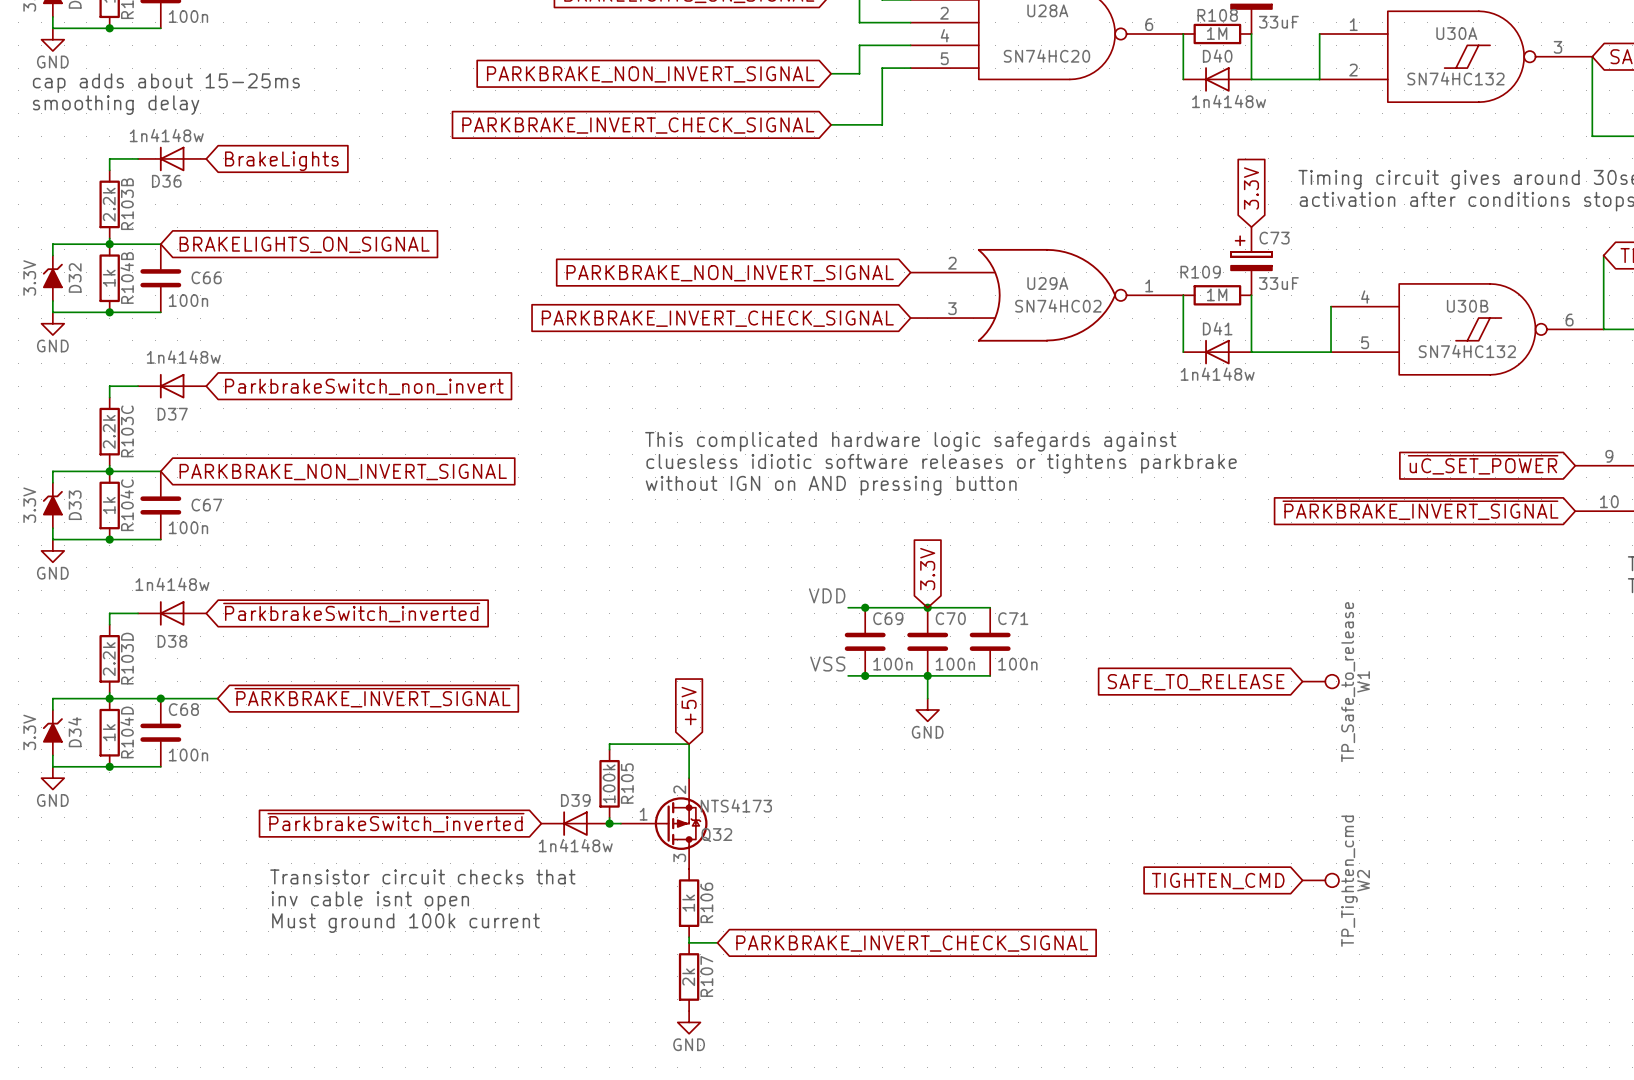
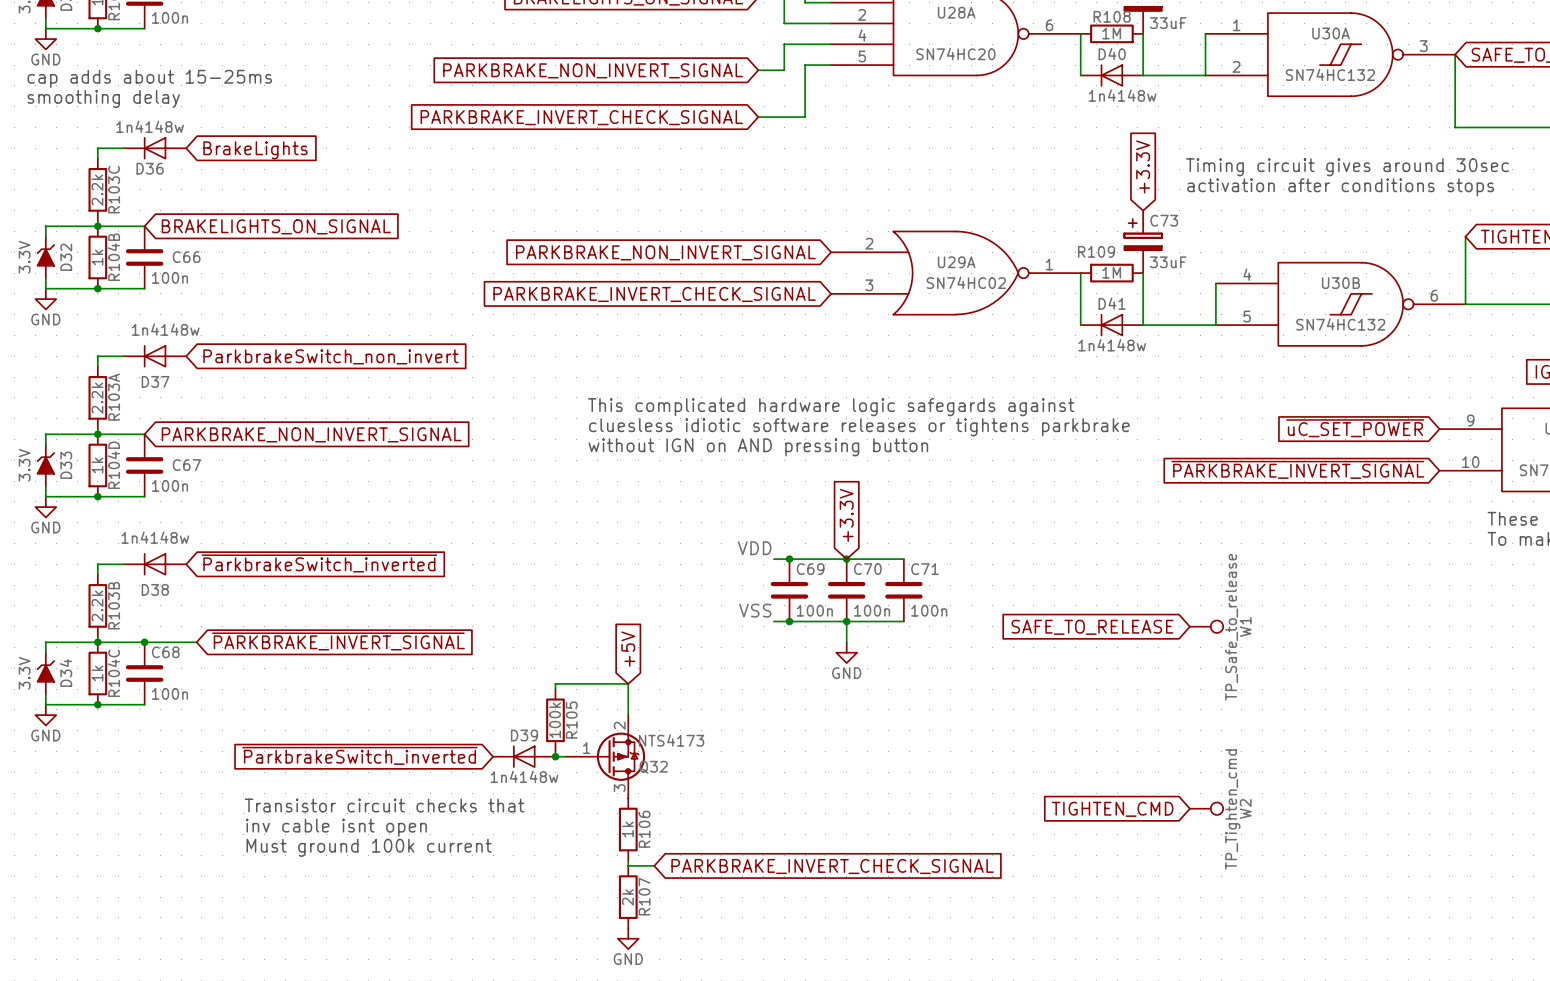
global label: 3.3V (1251, 188) -> +3.3V (1143, 166)
R103B name: R103B (127, 204) -> R103C (114, 189)
R103C name: R103C (127, 431) -> R103A (114, 397)
R104C name: R104C (127, 505) -> R104D (113, 465)
global label: 3.3V (927, 569) -> +3.3V (846, 515)
R103D name: R103D (127, 658) -> R103B (114, 605)
R104D name: R104D (127, 732) -> R104C (113, 673)

